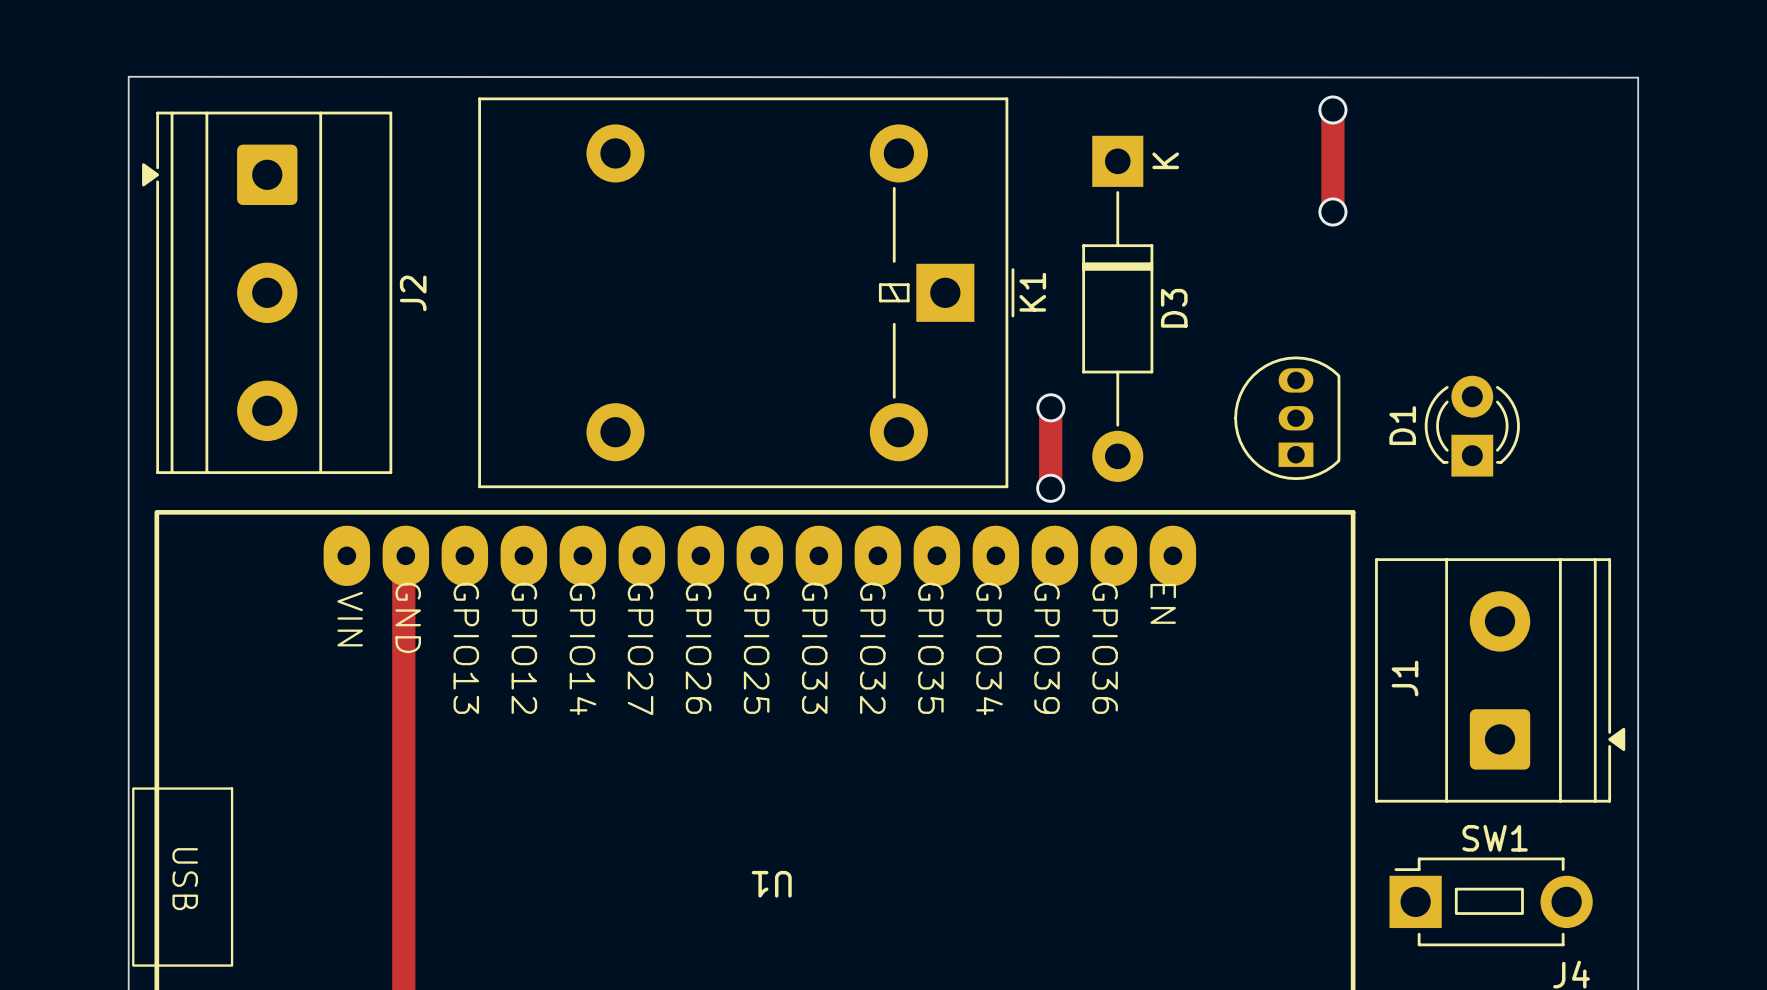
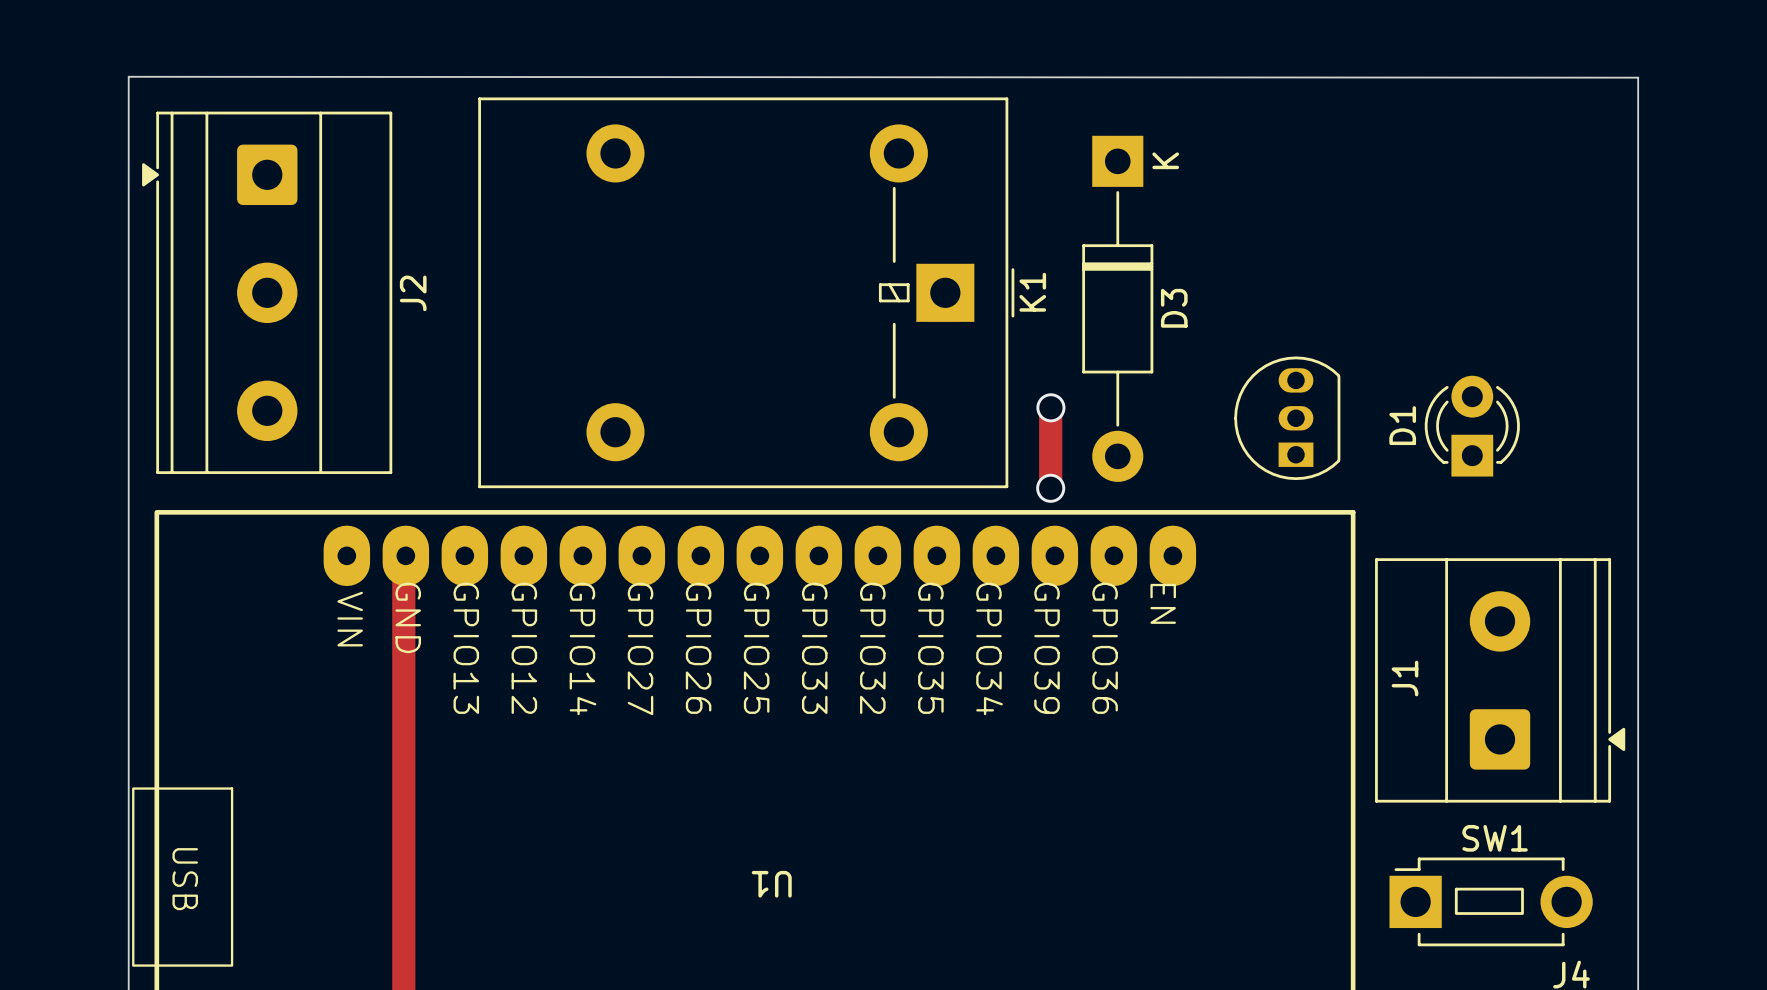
track: (1332, 110) (1332, 211) -> none
via: (1332, 110) -> none
via: (1332, 211) -> none

